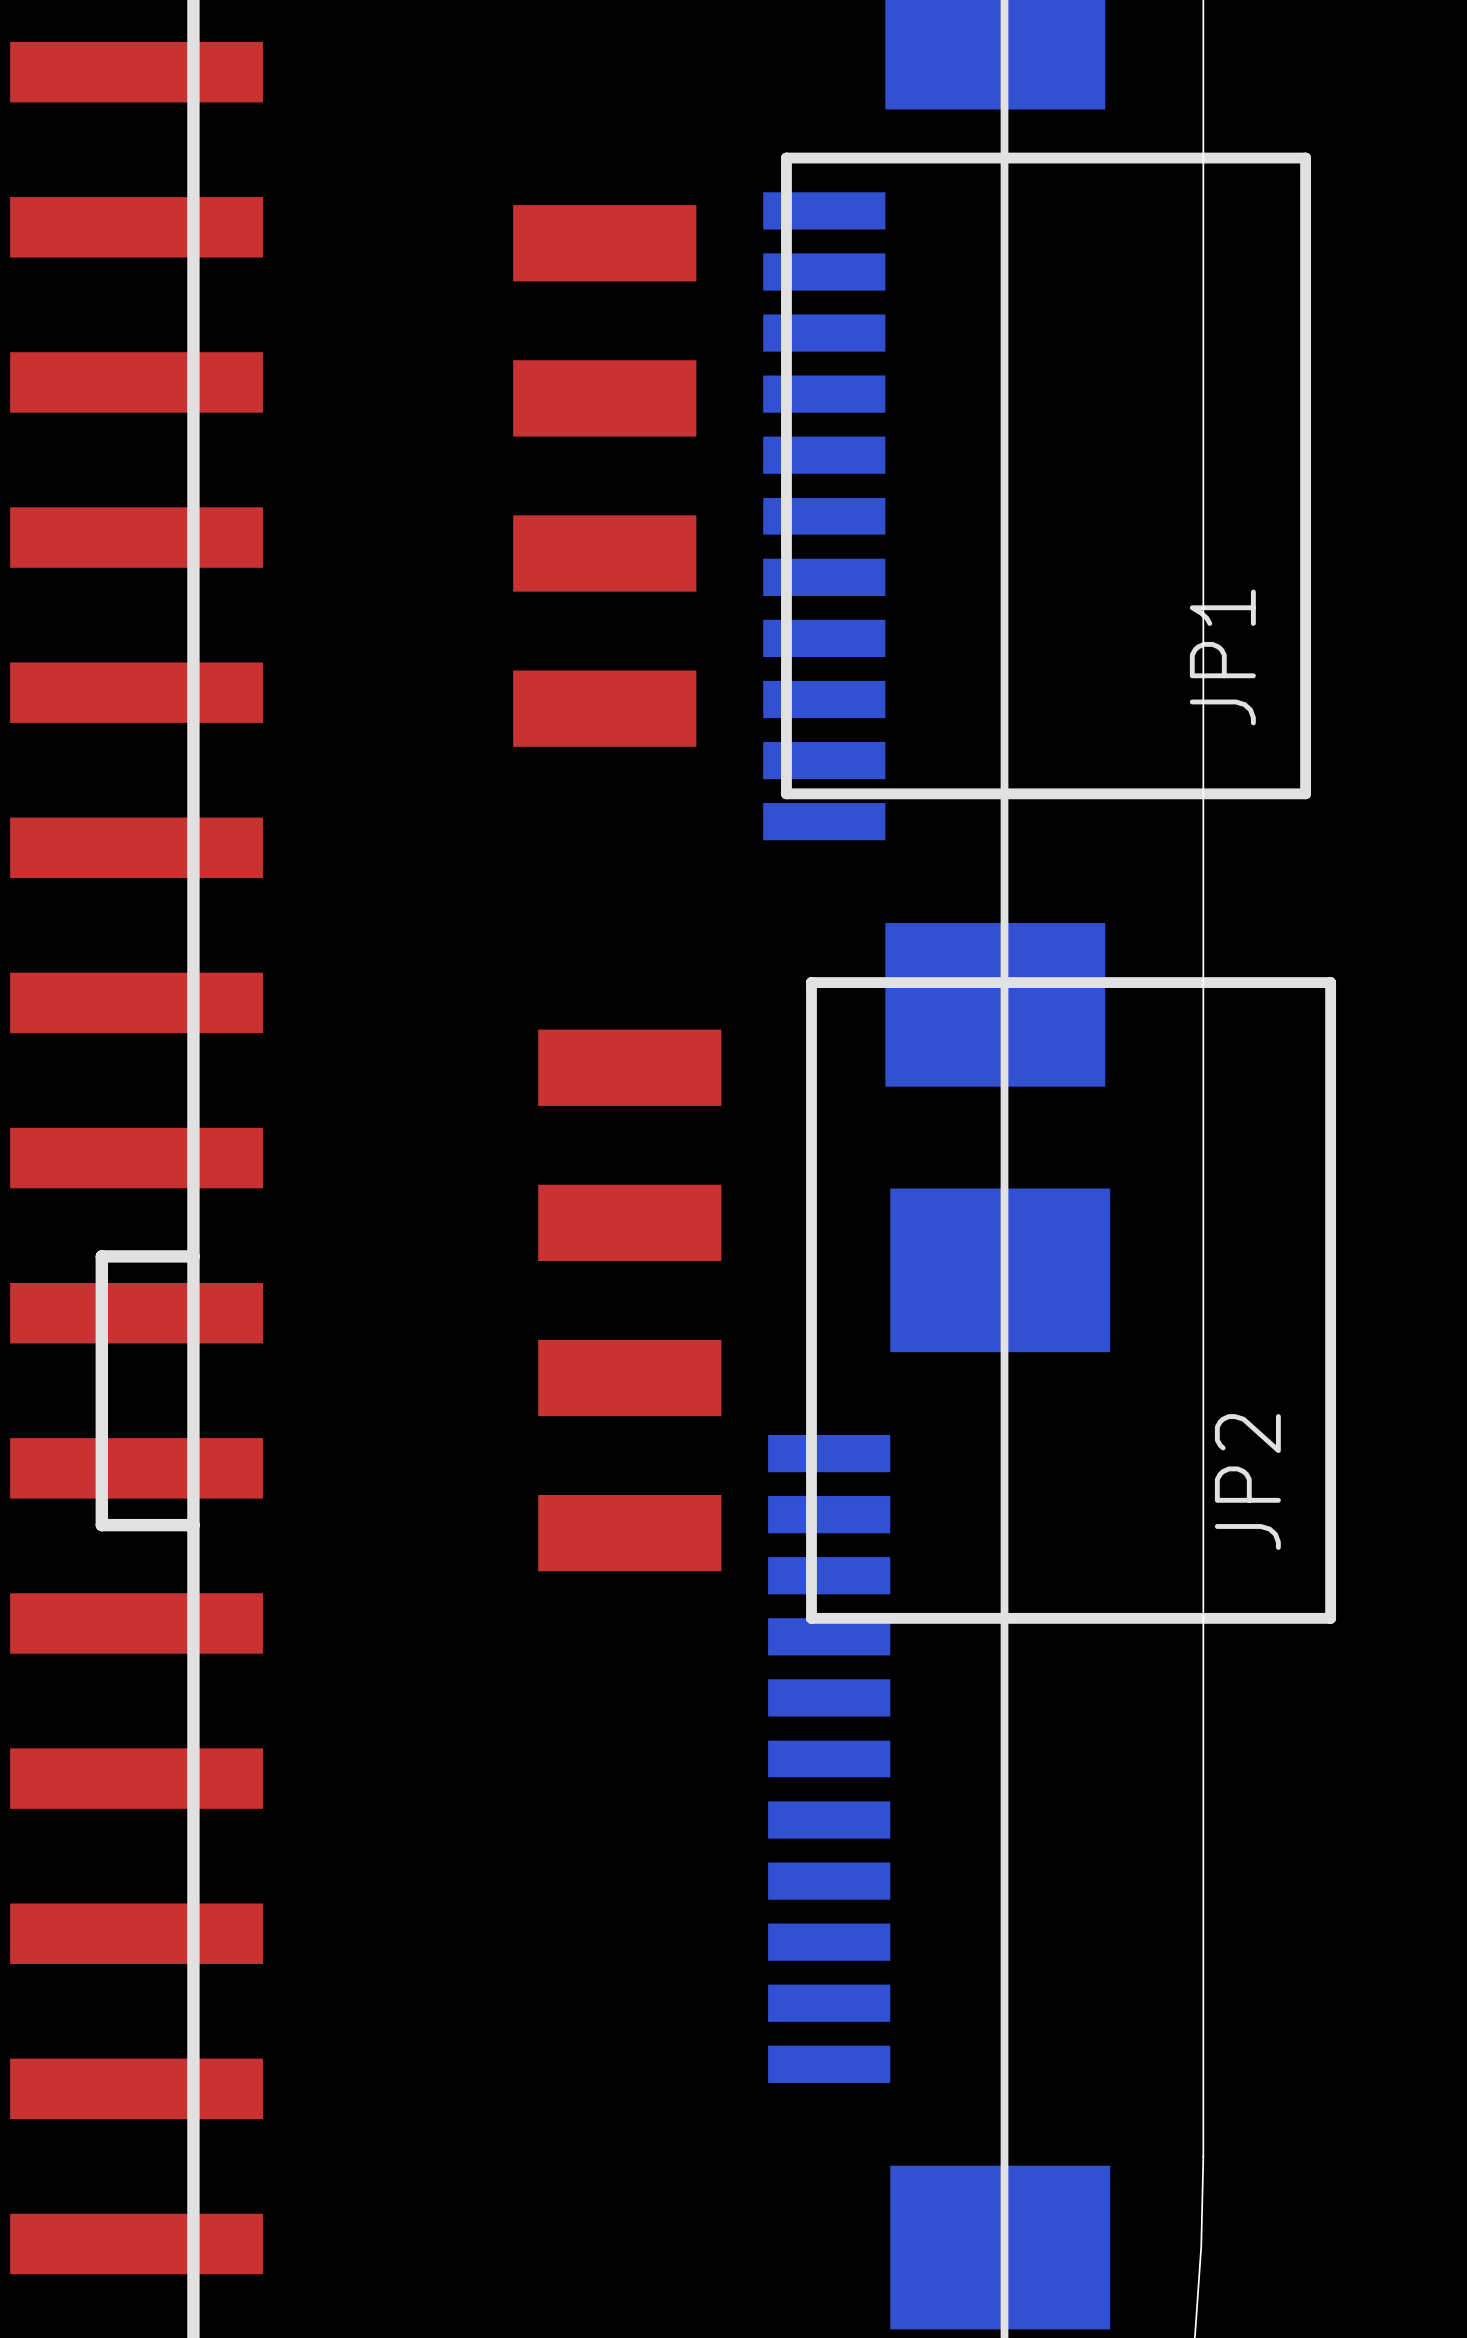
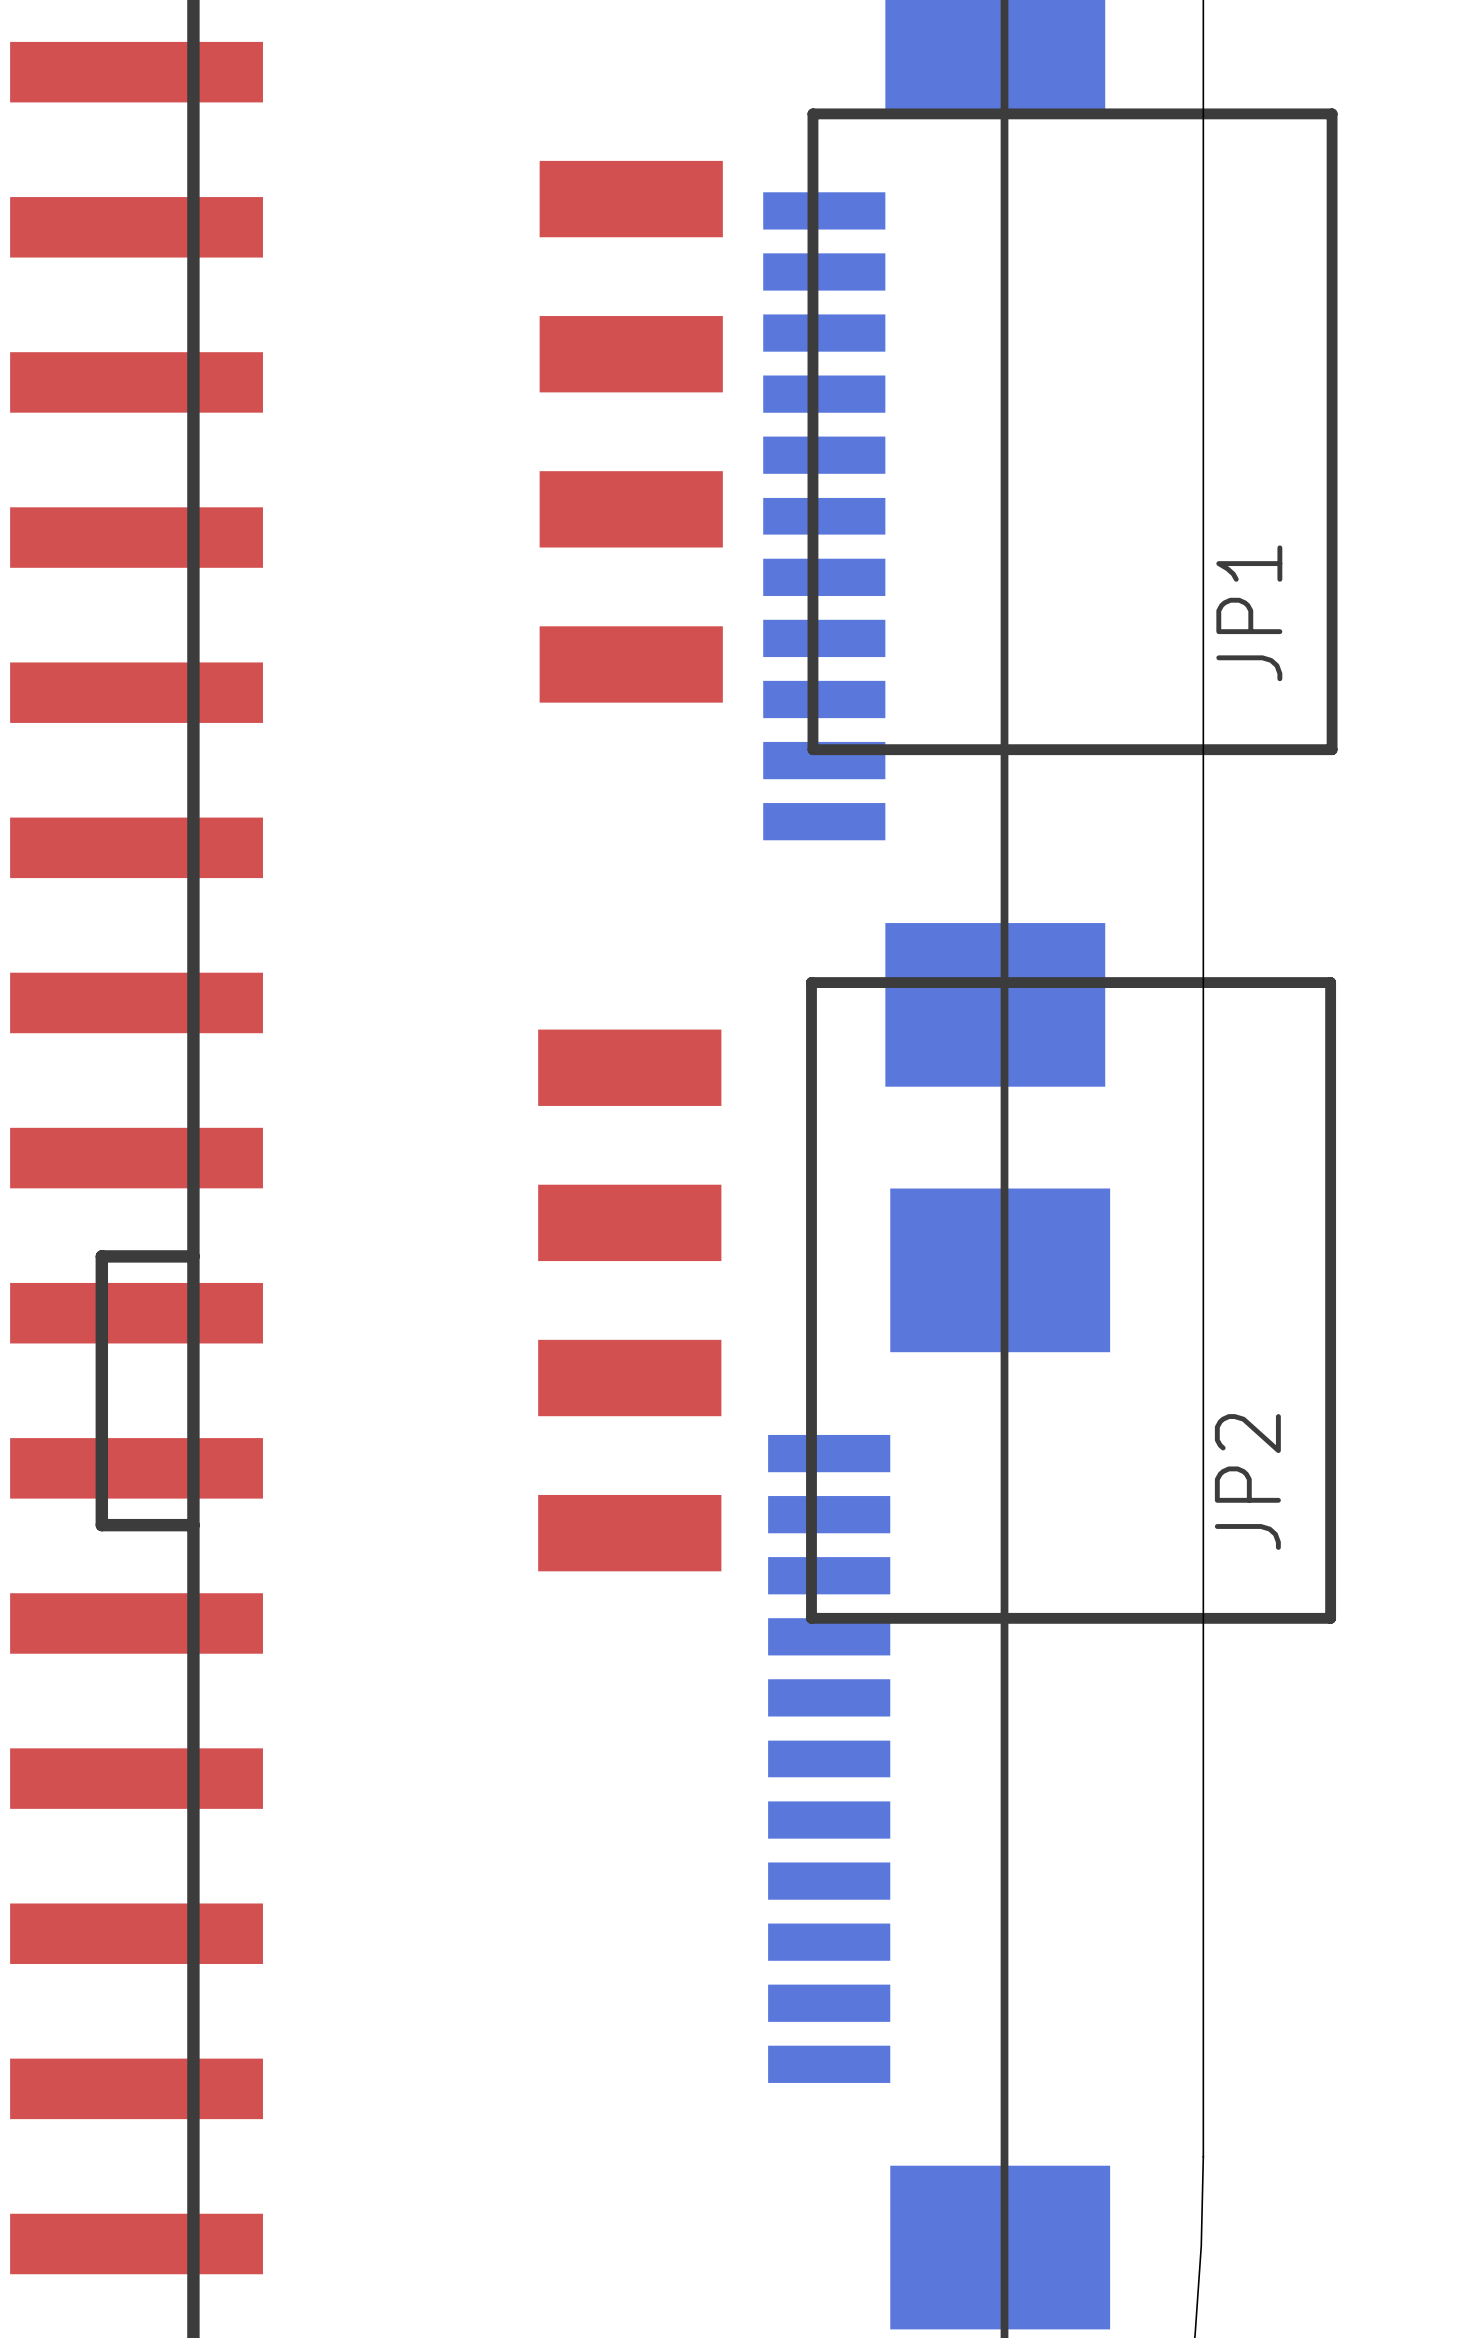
JP1 position: (912, 475) -> (938, 431)

